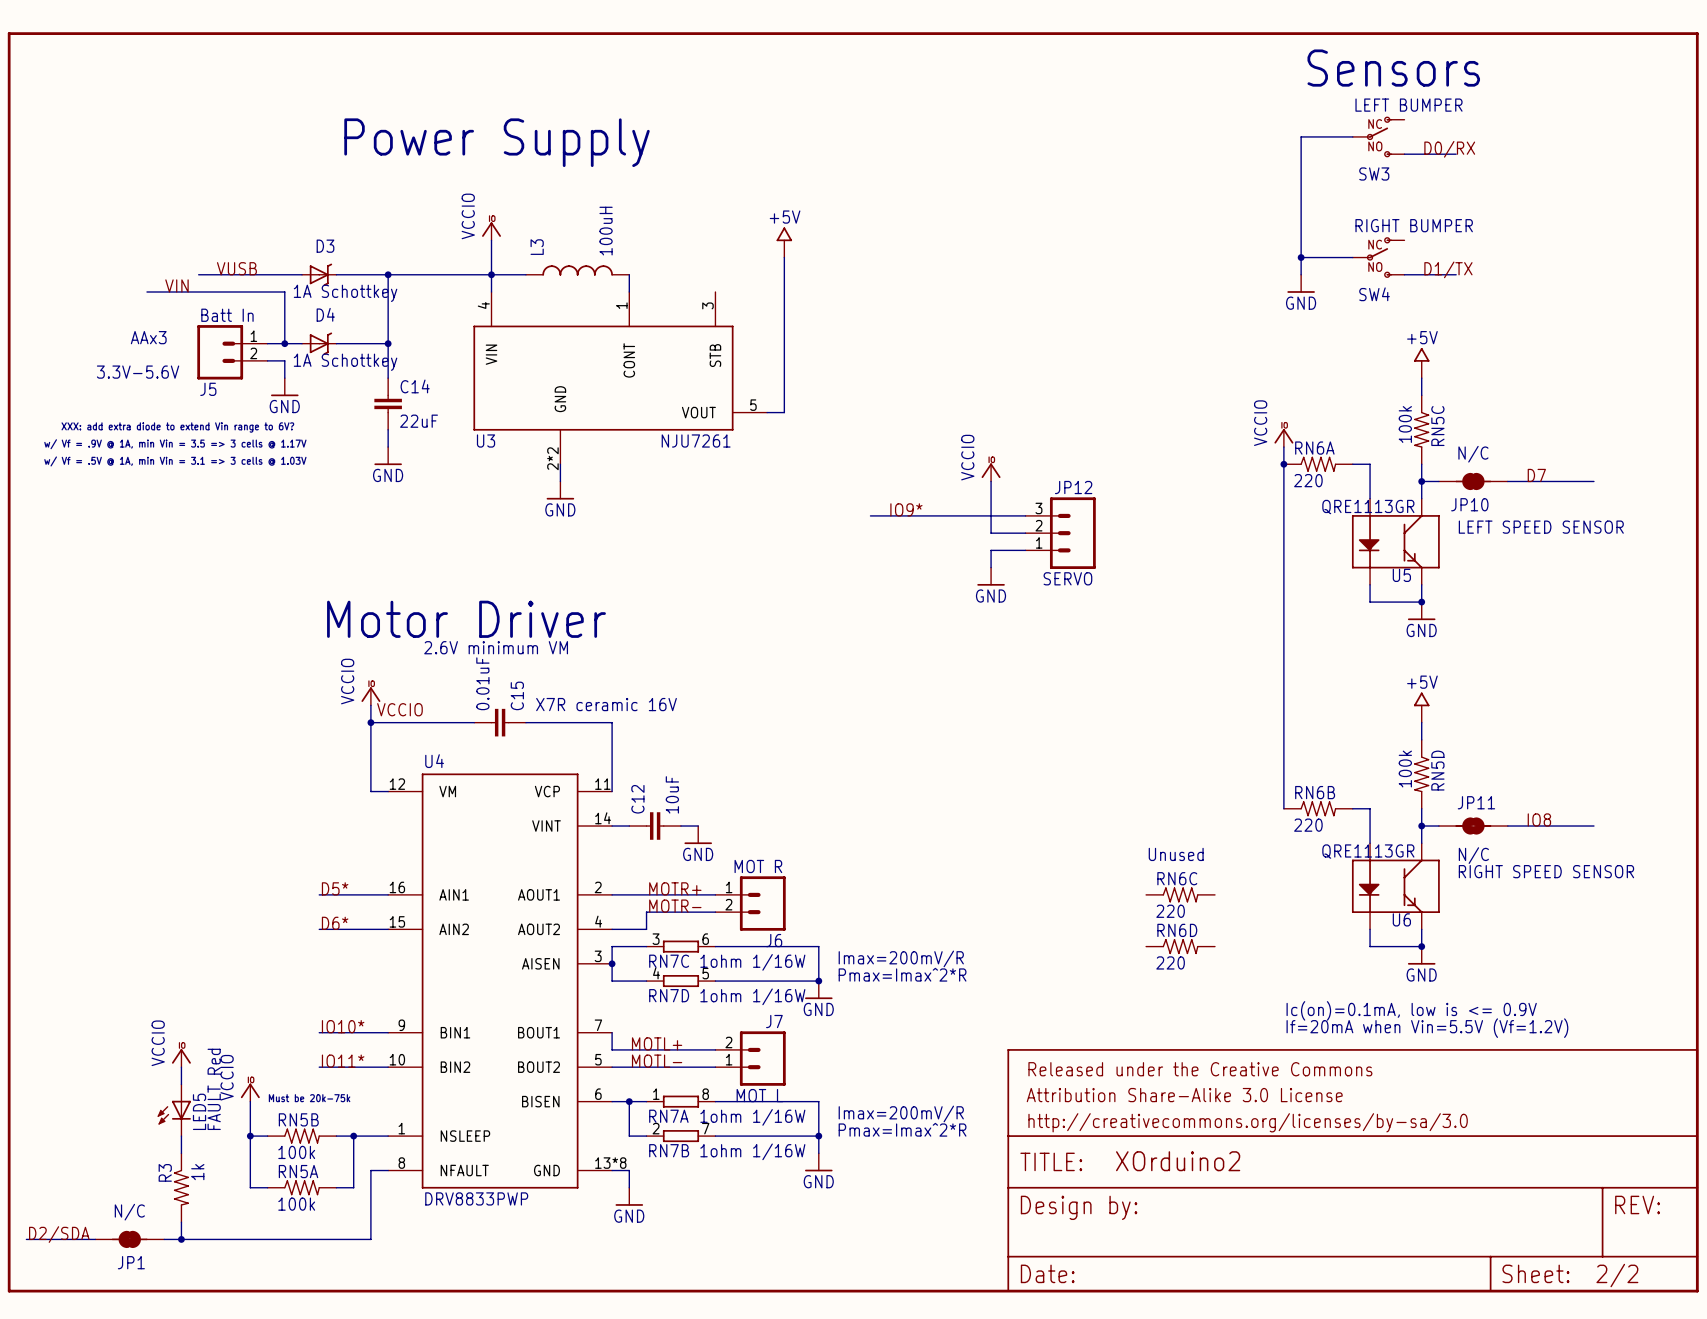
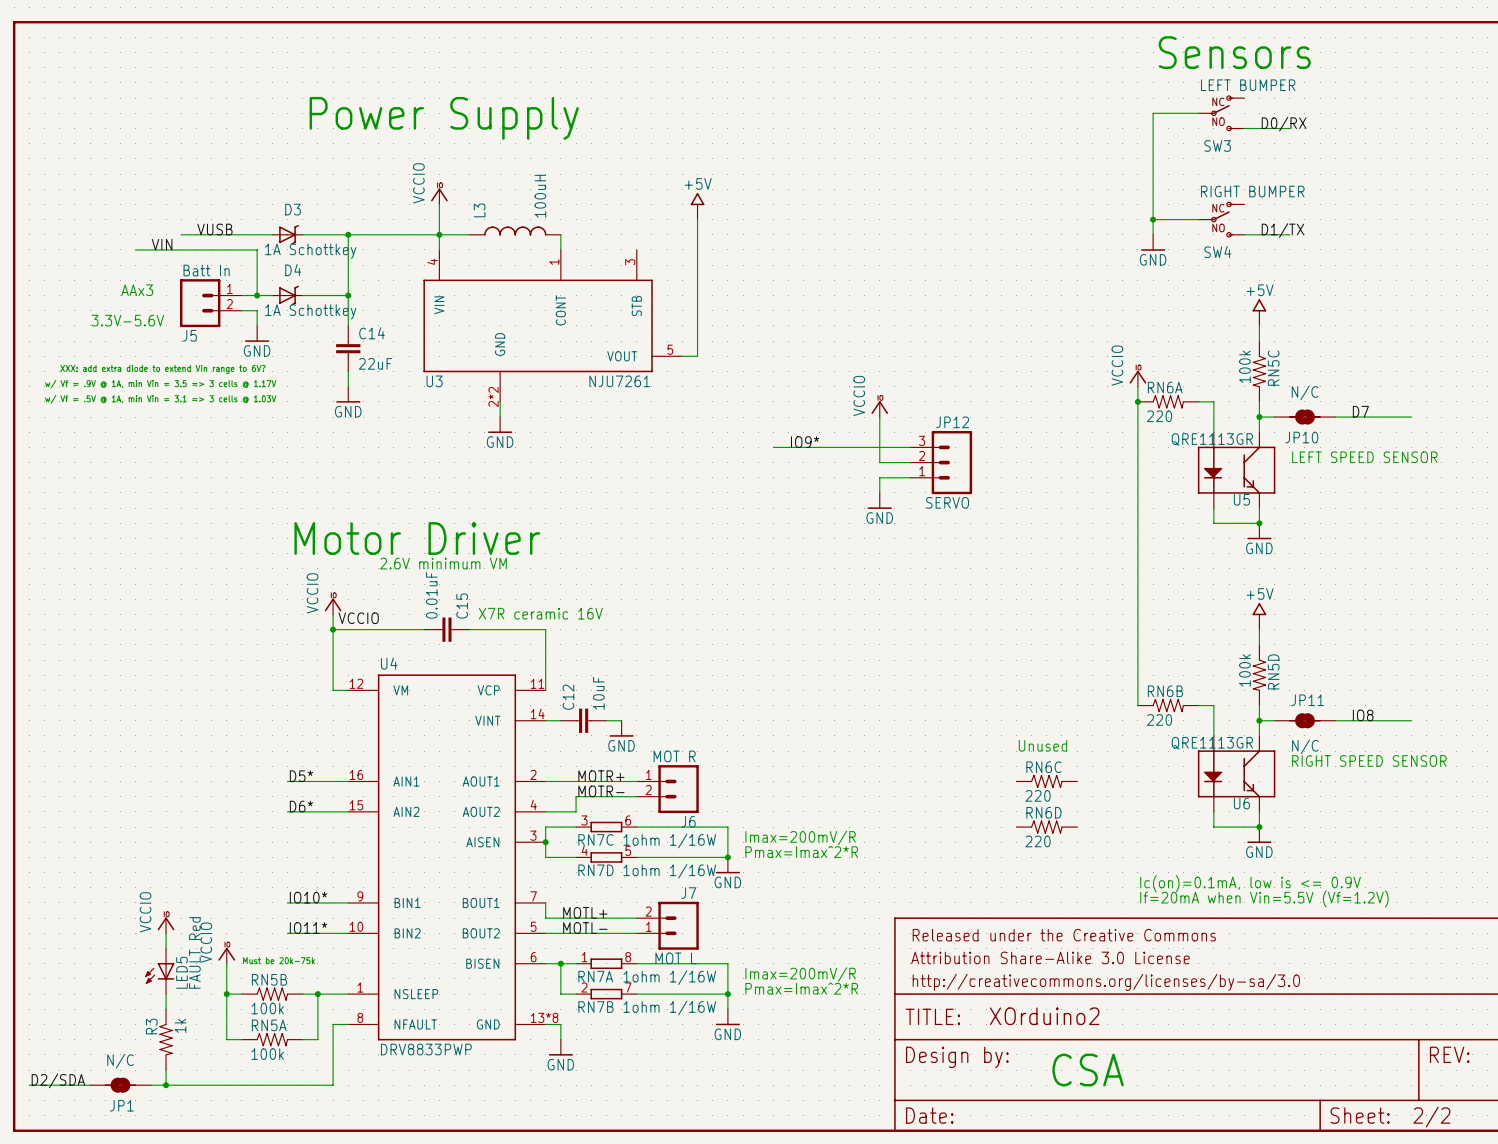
text: none -> CSA (1088, 1070)

